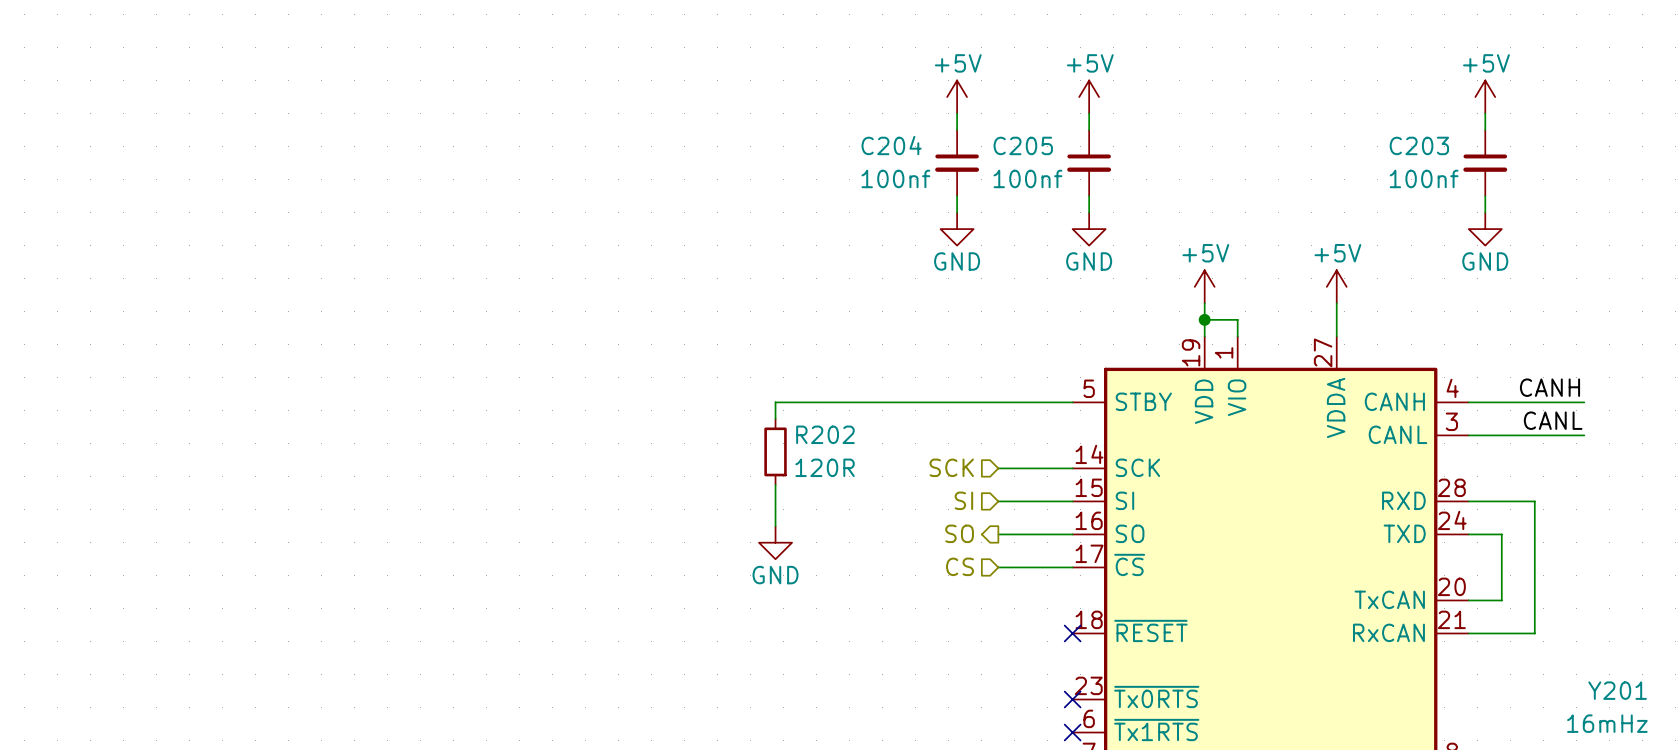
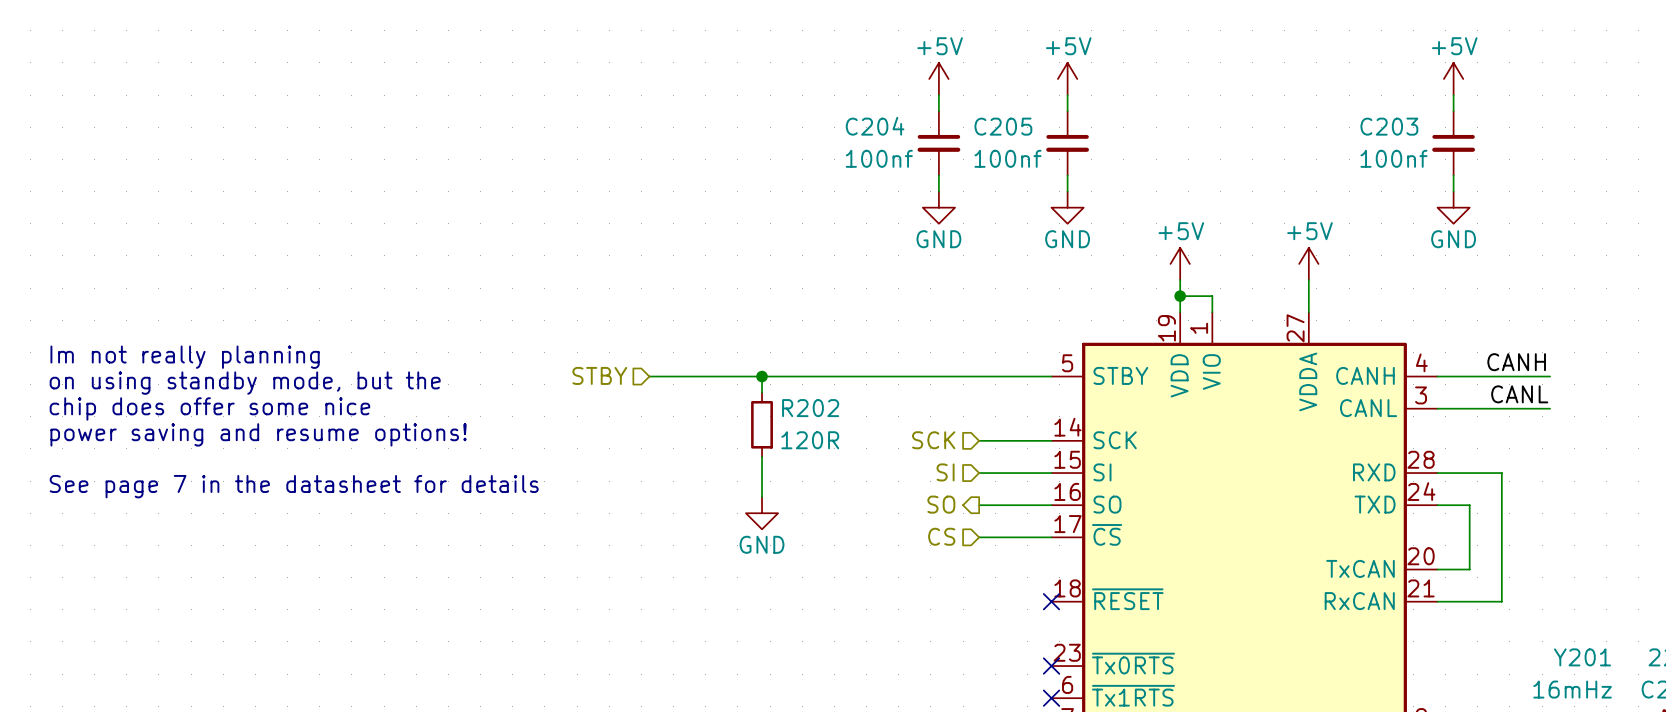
text: none -> Im not really planning (185, 357)
hierarchical label: none -> STBY (599, 375)
wire: none -> (649, 376) (762, 376)
junction: none -> (762, 376)
text: none -> on using standby mode, but the (245, 383)
text: none -> chip does offer some nice (209, 408)
text: none -> power saving and resume options! (258, 434)
text: none -> See page 7 in the datasheet for details (294, 486)

